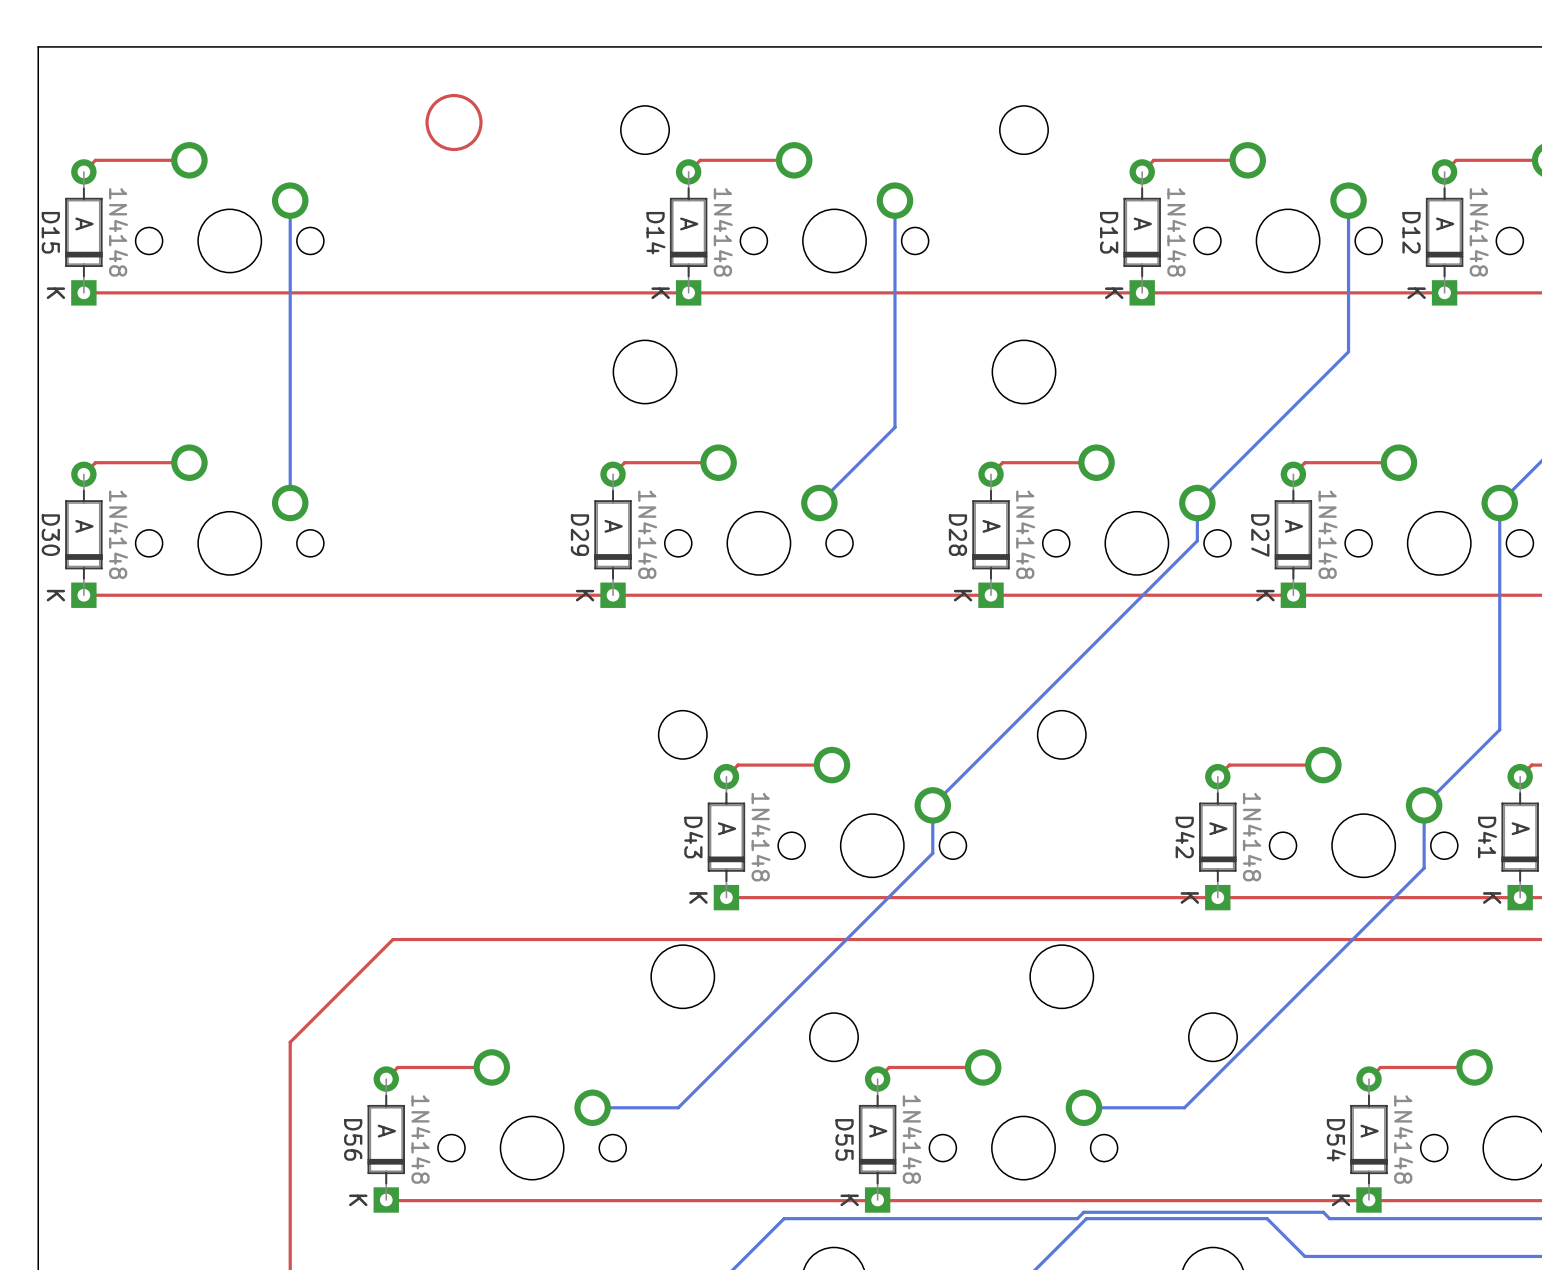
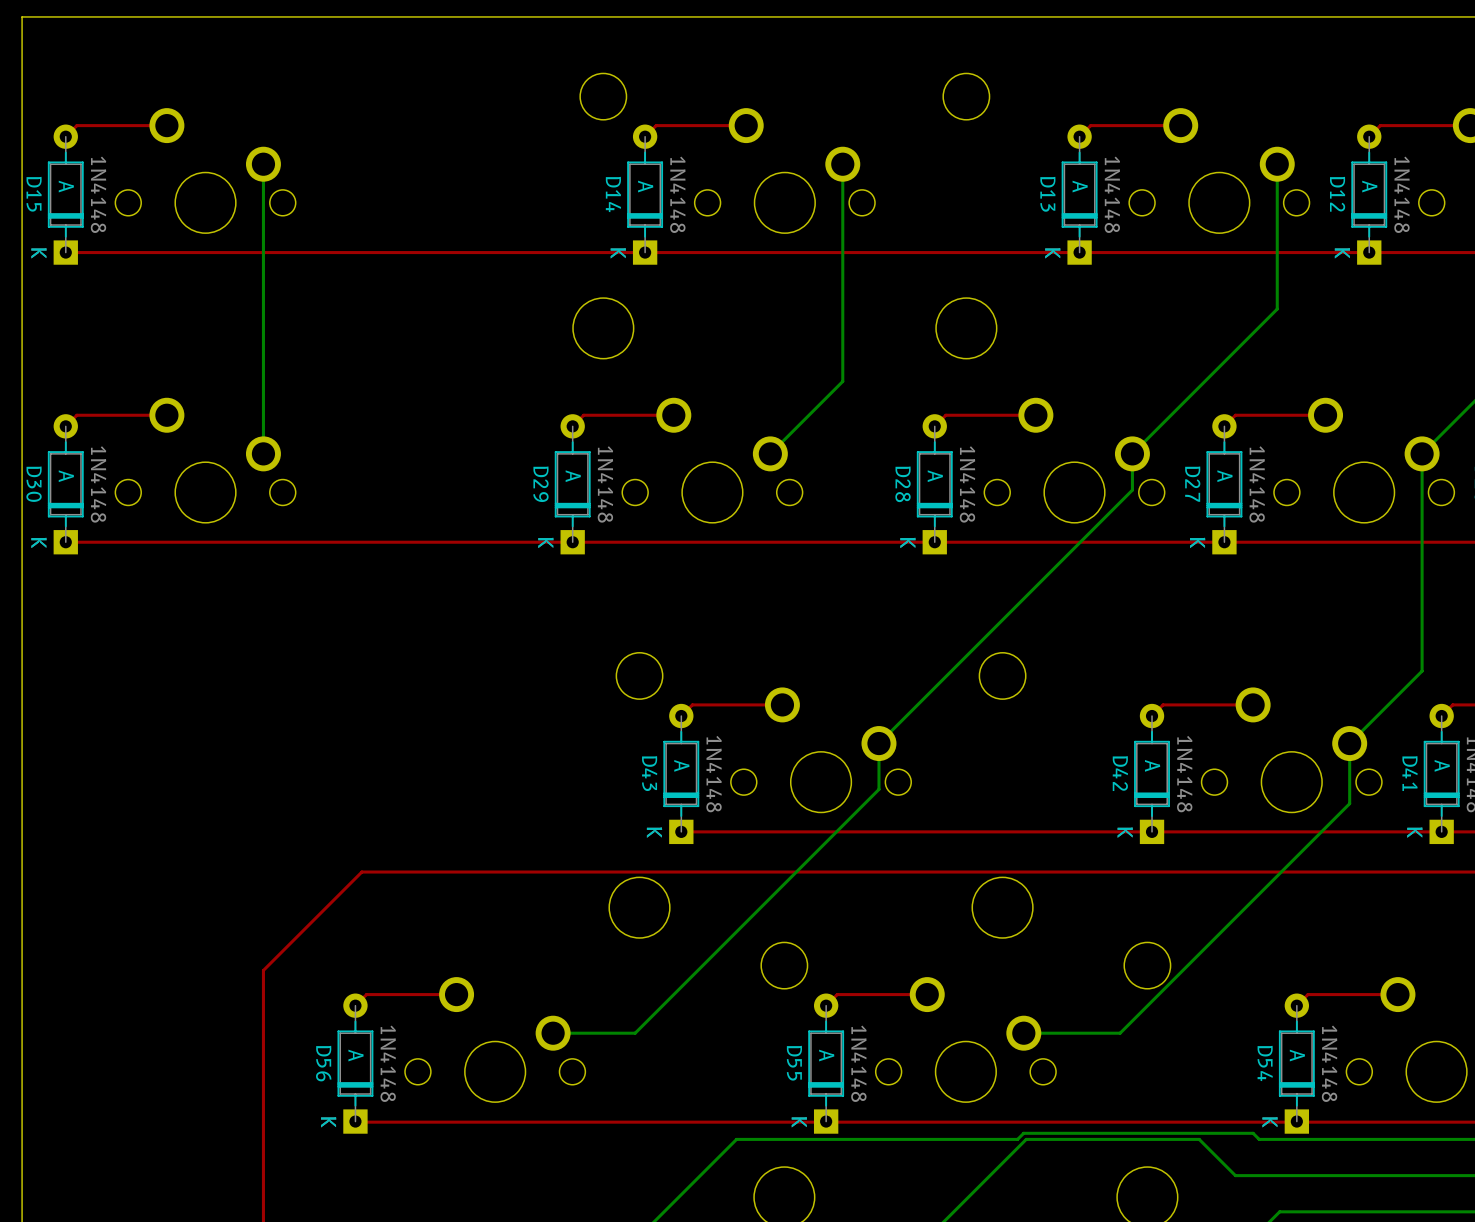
drawing: [425, 93, 483, 152] -> none

